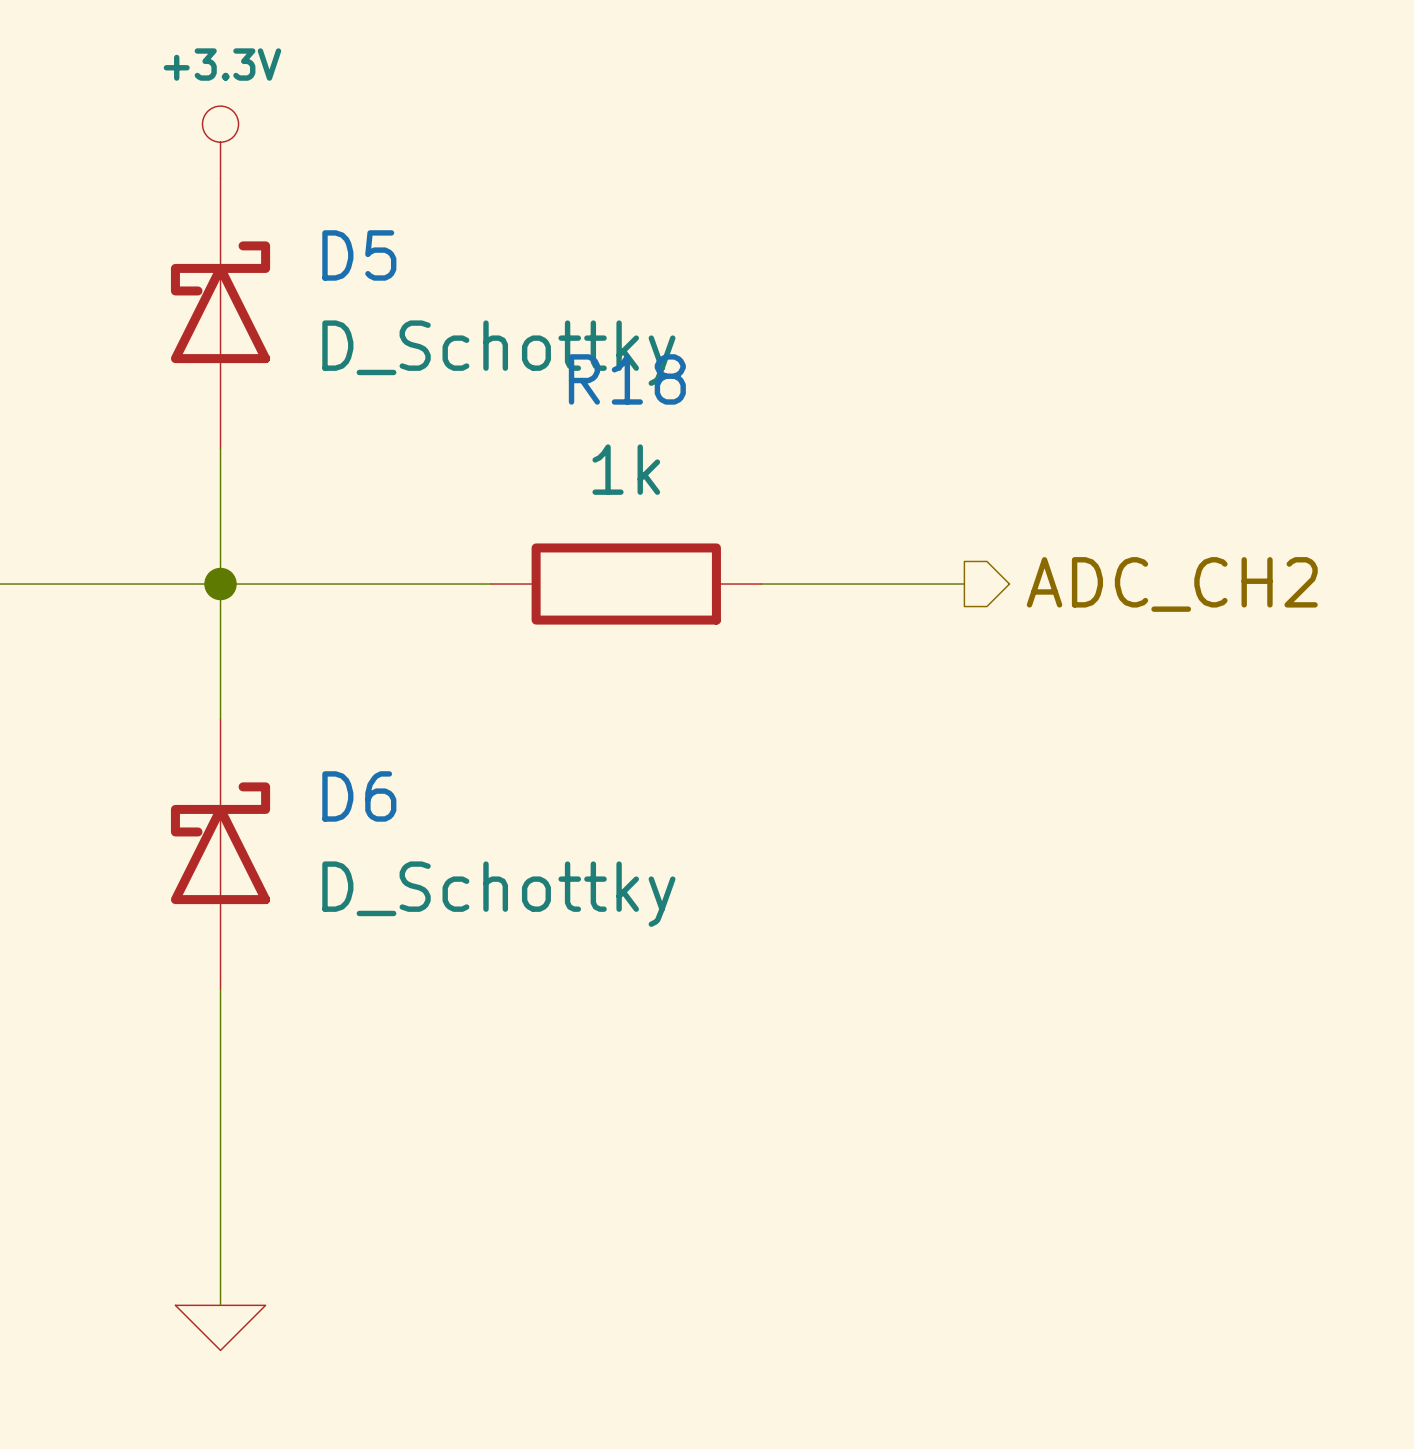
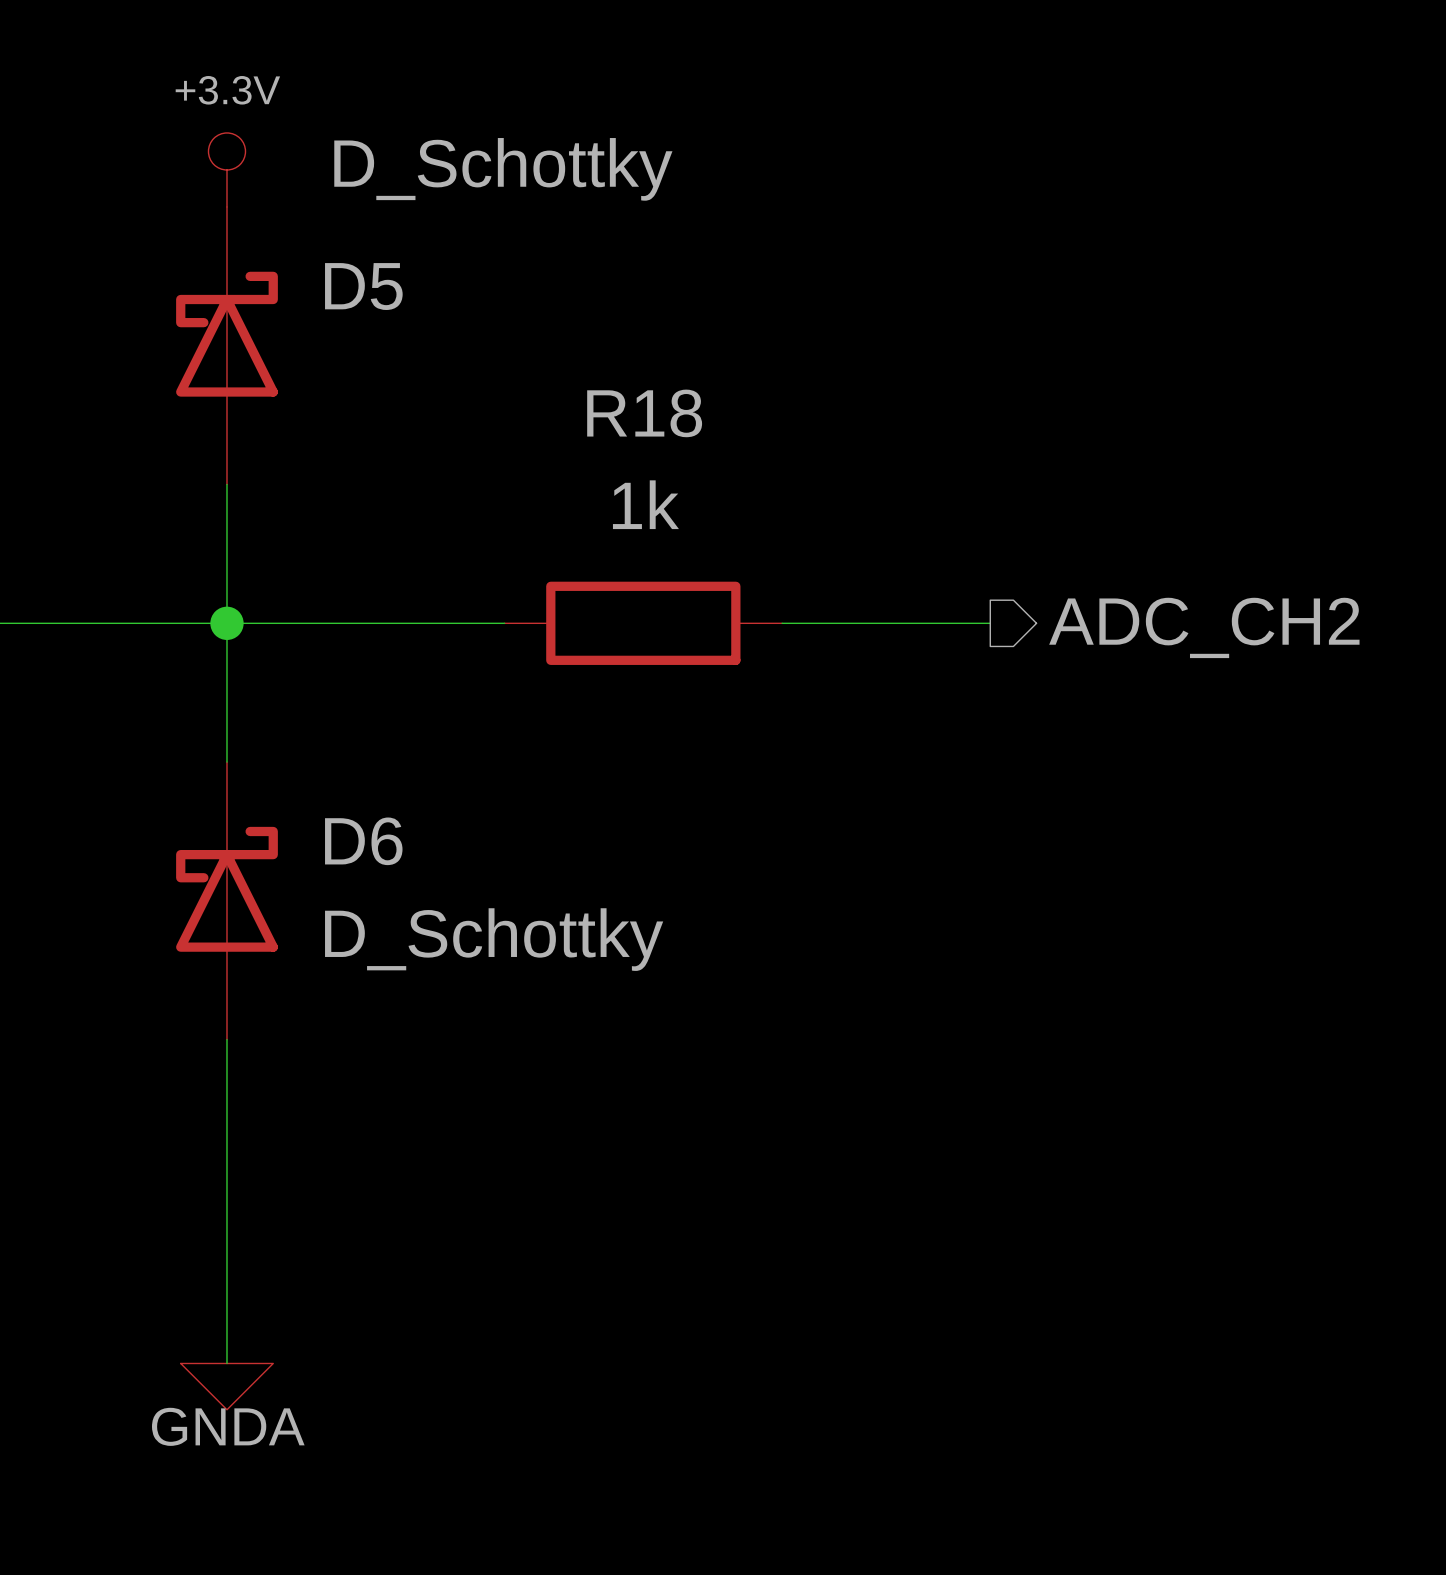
D5 value position: D_Schottky (498, 353) -> D_Schottky (503, 169)
power symbol text: none -> GNDA (228, 1426)

